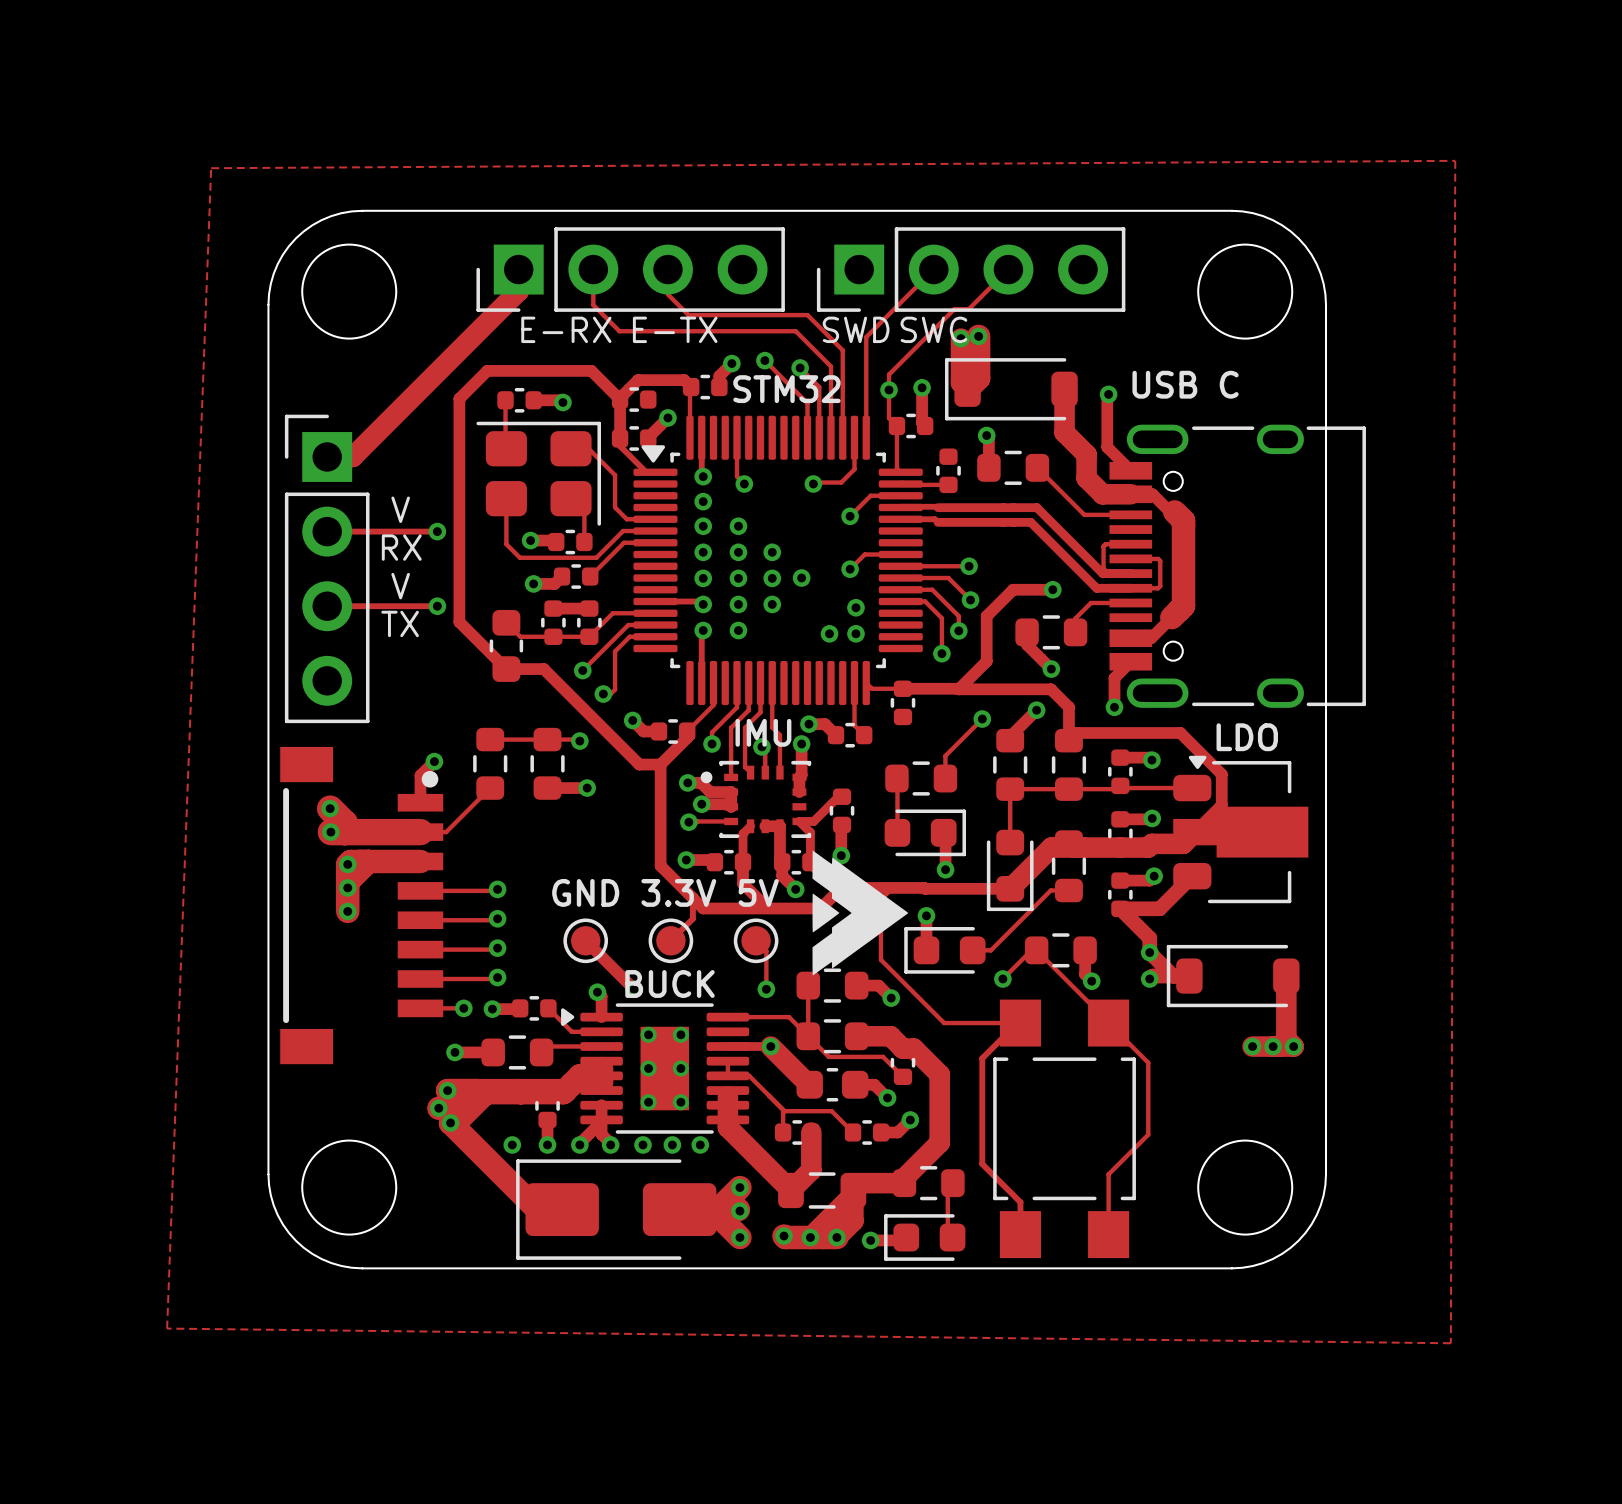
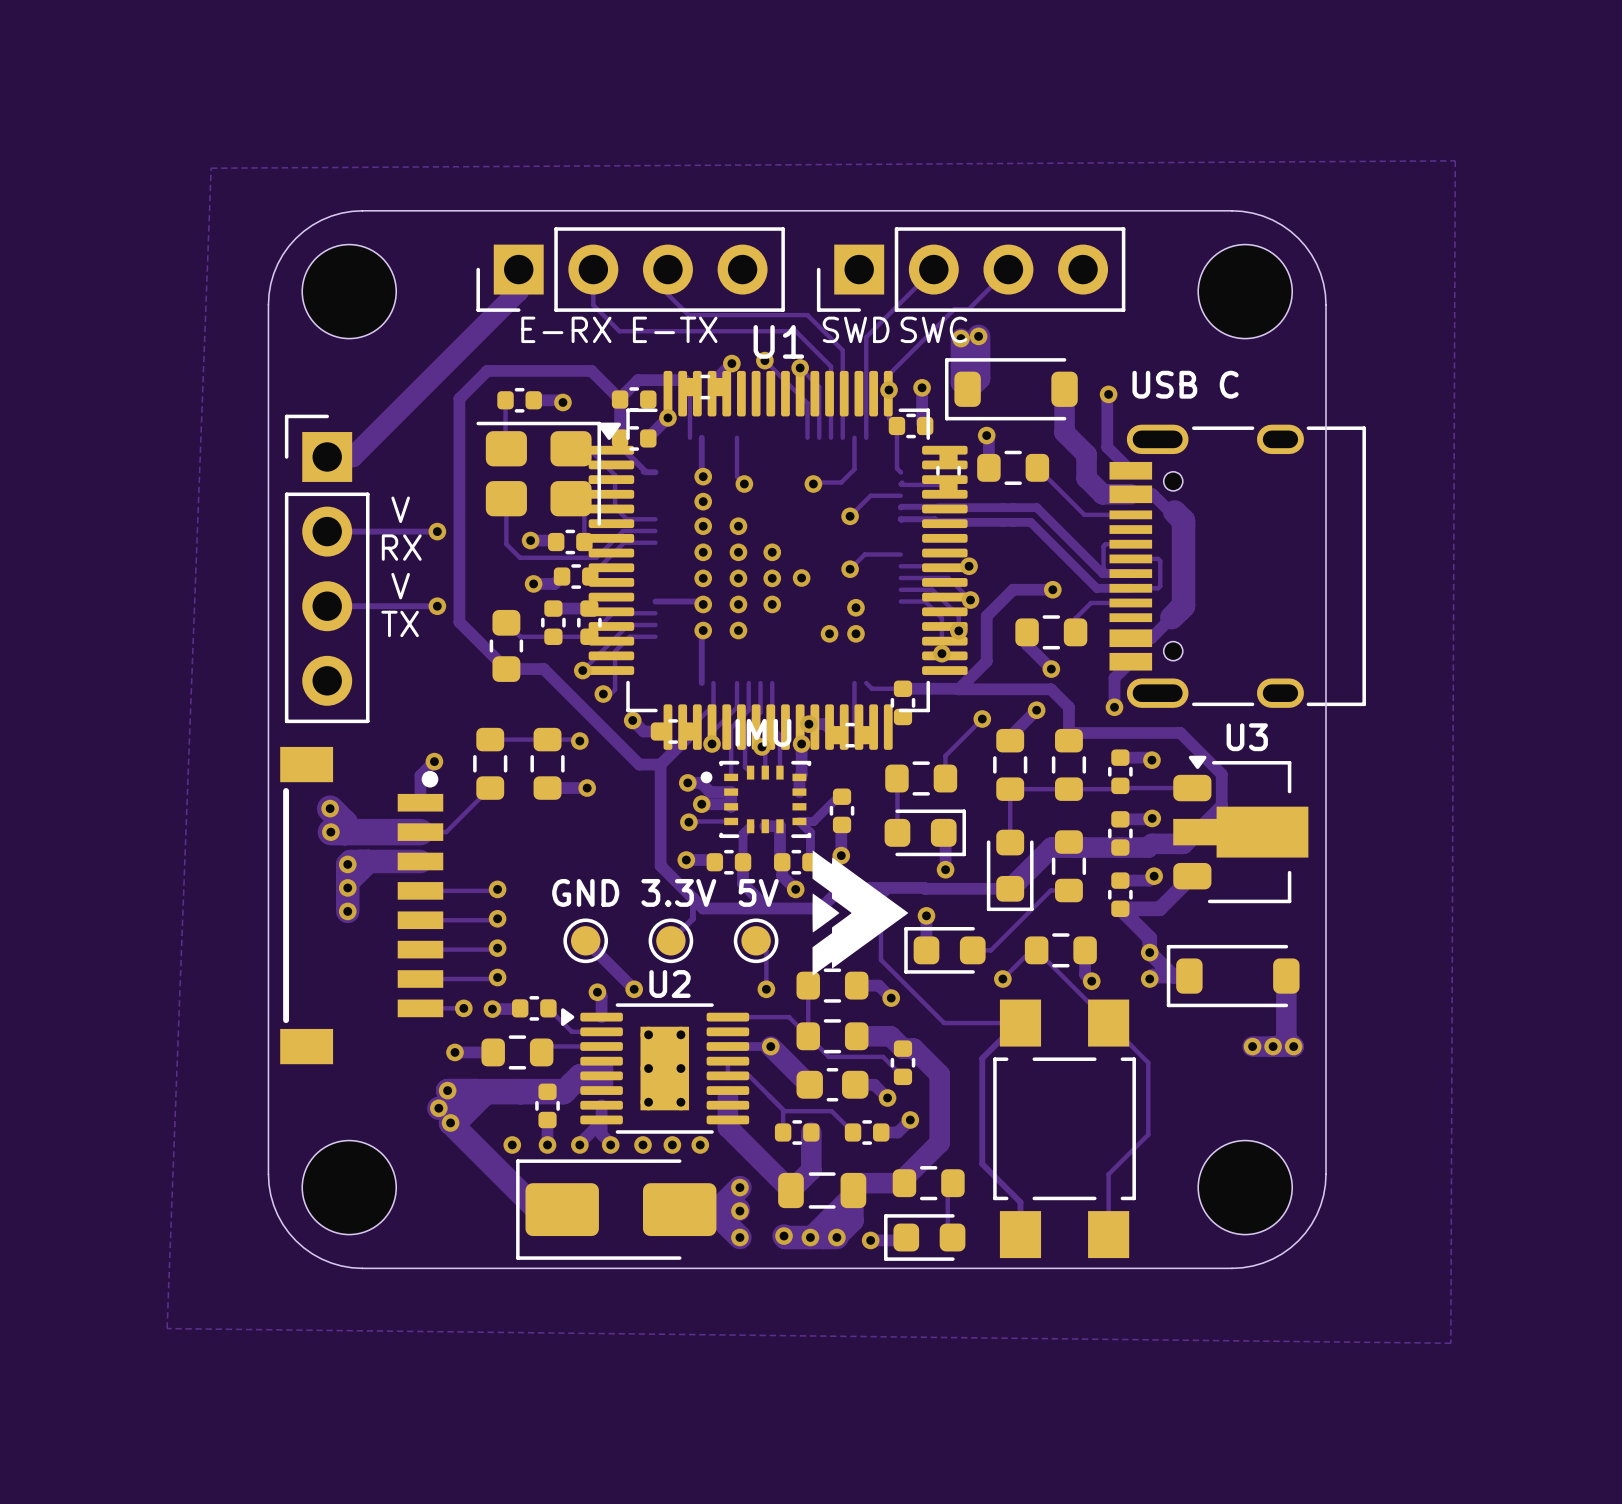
STM32: (778, 560) -> none
U1: none -> (778, 560)
LDO name: LDO (1247, 737) -> U3 (1247, 737)
BUCK name: BUCK (670, 984) -> U2 (670, 984)

